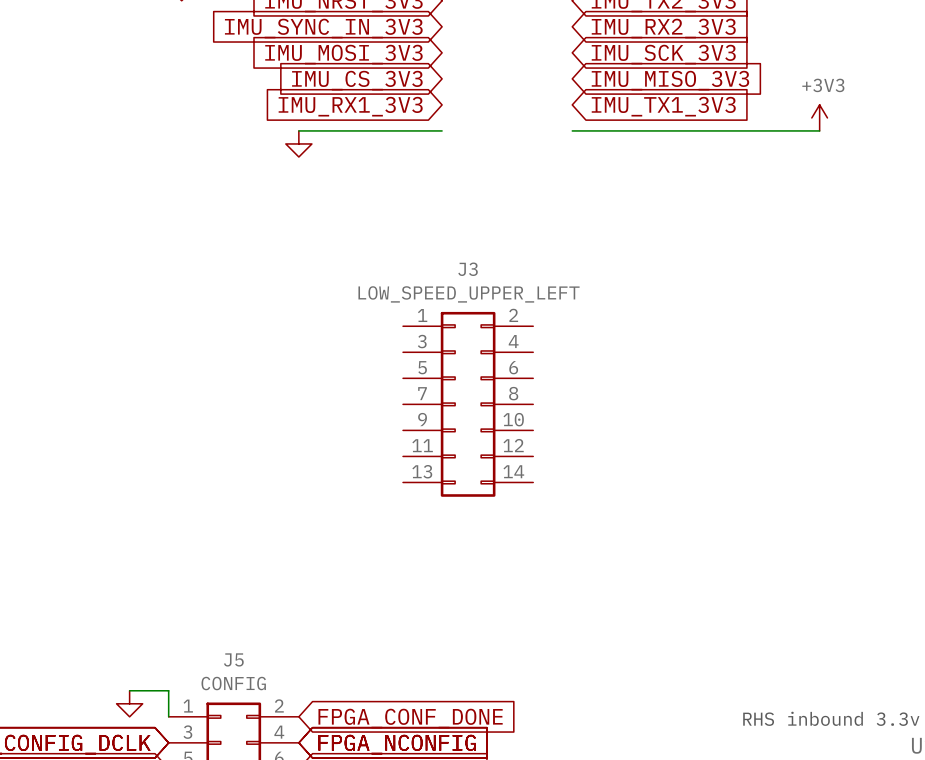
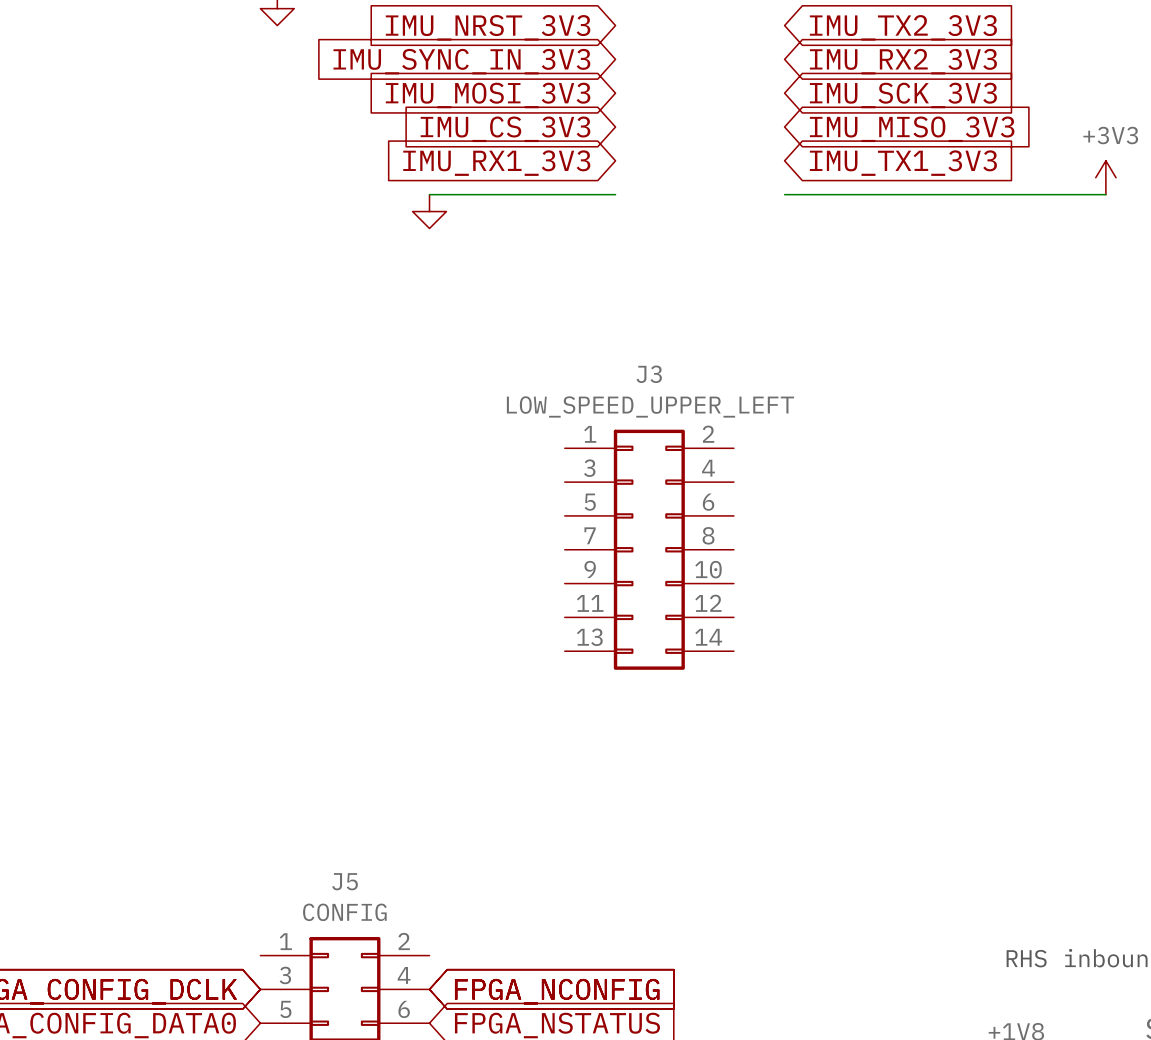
wire: (129, 690) (168, 690) (168, 716) -> none
power symbol: (129, 703) -> none
global label: FPGA_CONF_DONE (410, 718) -> none

